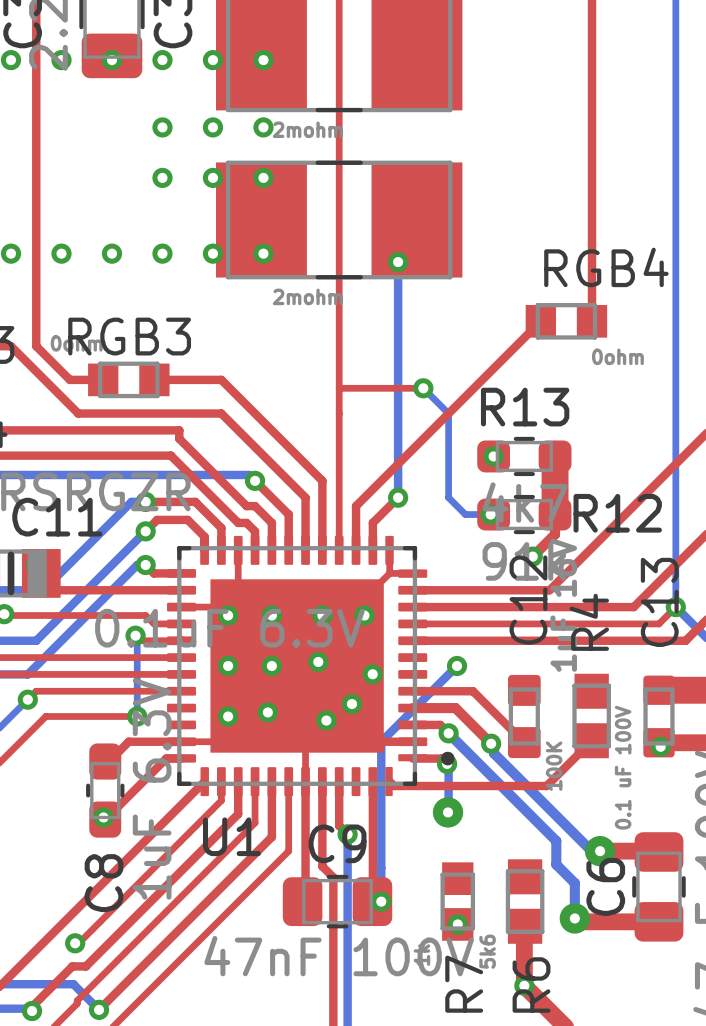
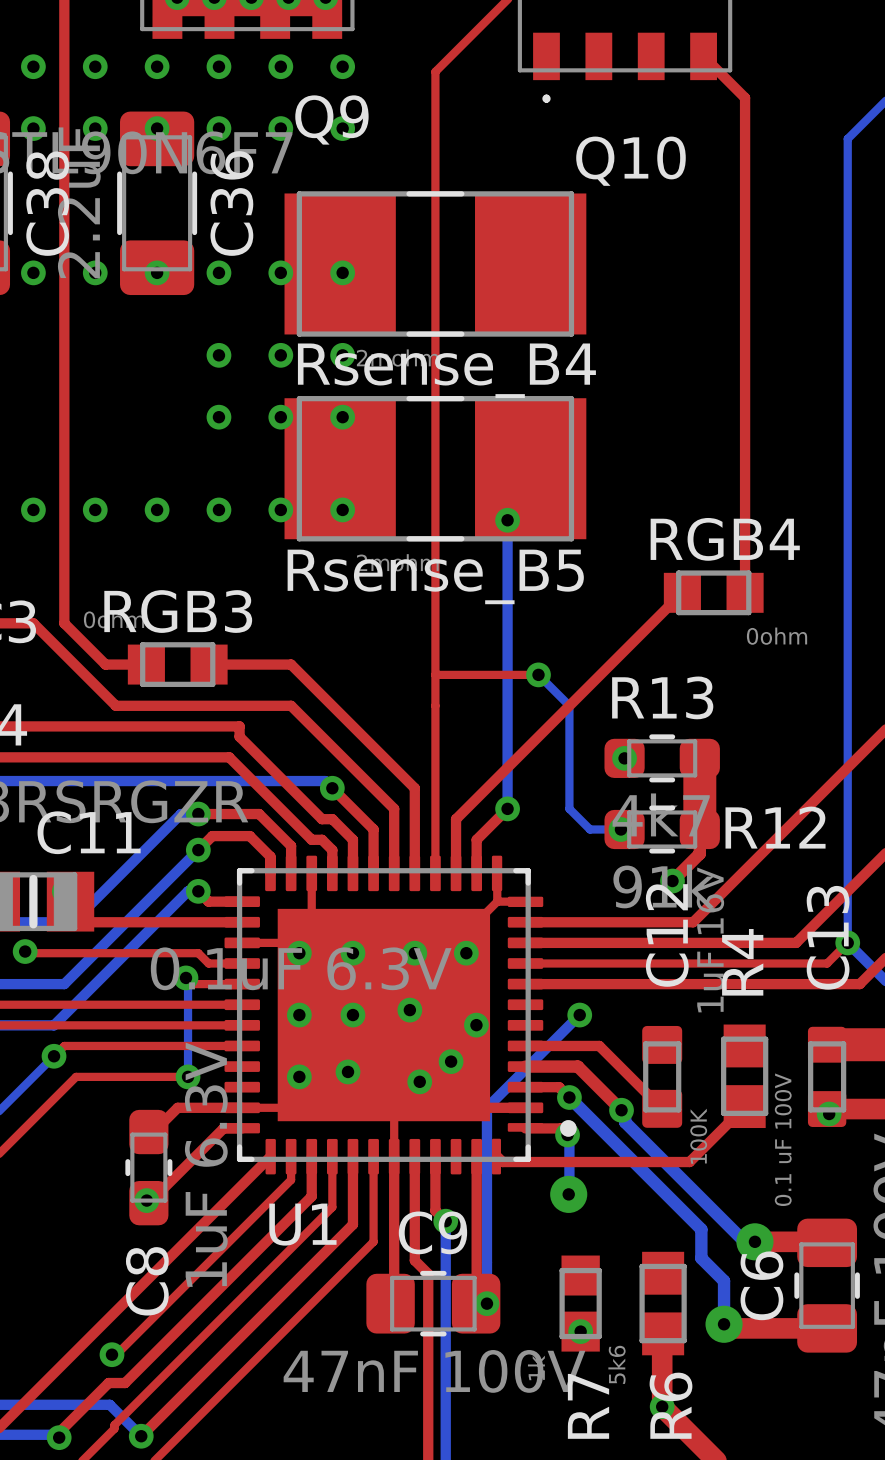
Rsense_B4 name: none -> Rsense_B4 (446, 370)
RGB4 name position: RGB4 (606, 267) -> RGB4 (725, 539)
Rsense_B5 name: none -> Rsense_B5 (435, 576)

